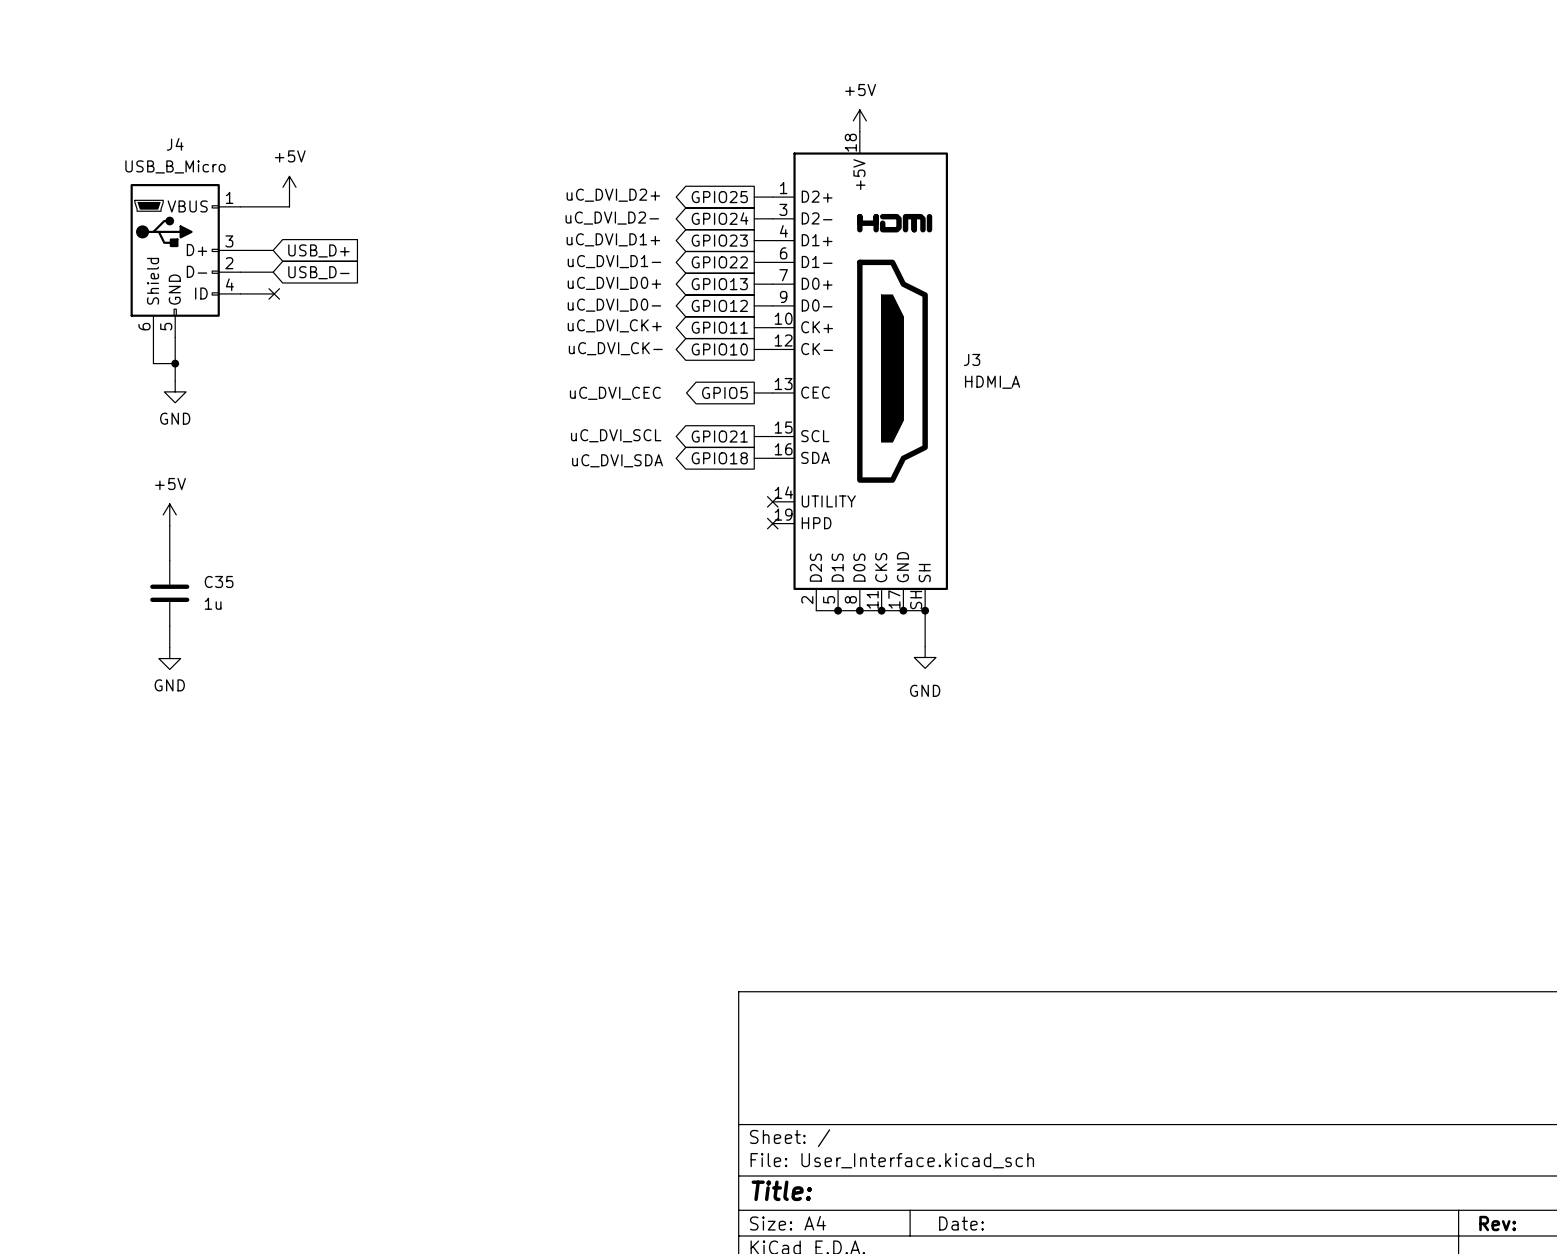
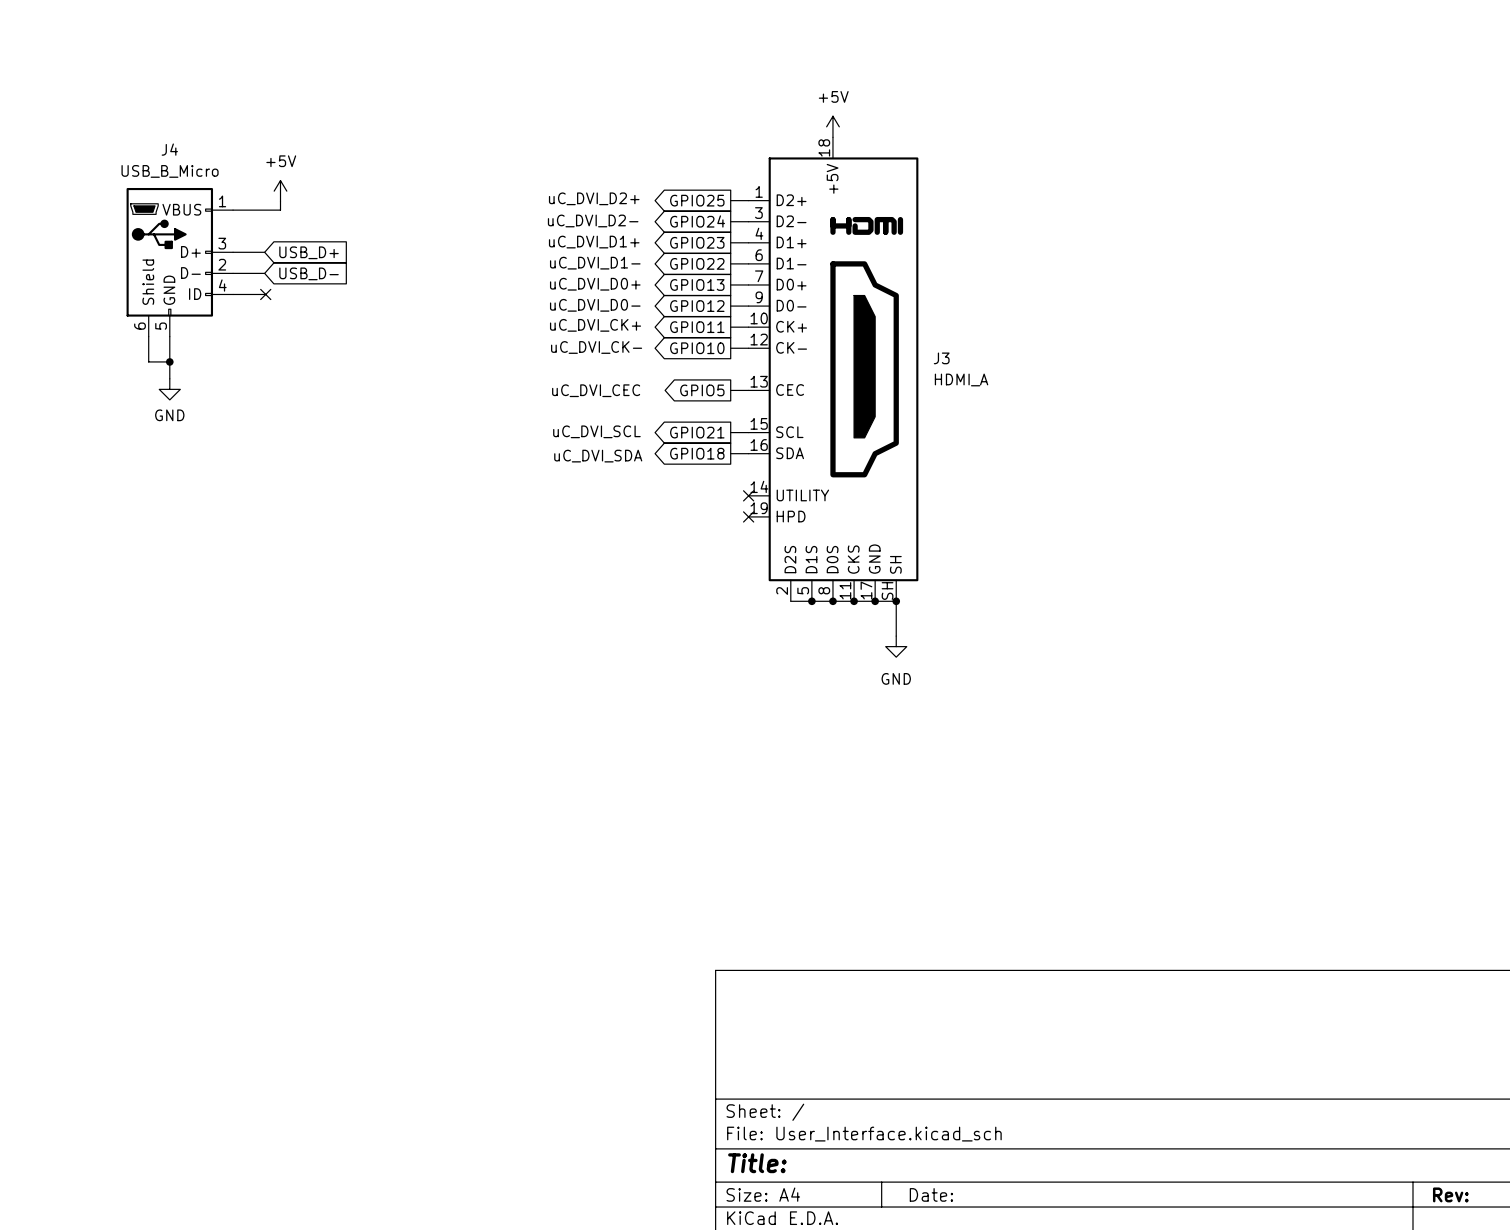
power symbol: +5V (169, 514) -> none
wire: (169, 525) (169, 560) -> none
C35: 1u (169, 593) -> none
wire: (169, 625) (169, 647) -> none
power symbol: GND (169, 658) -> none

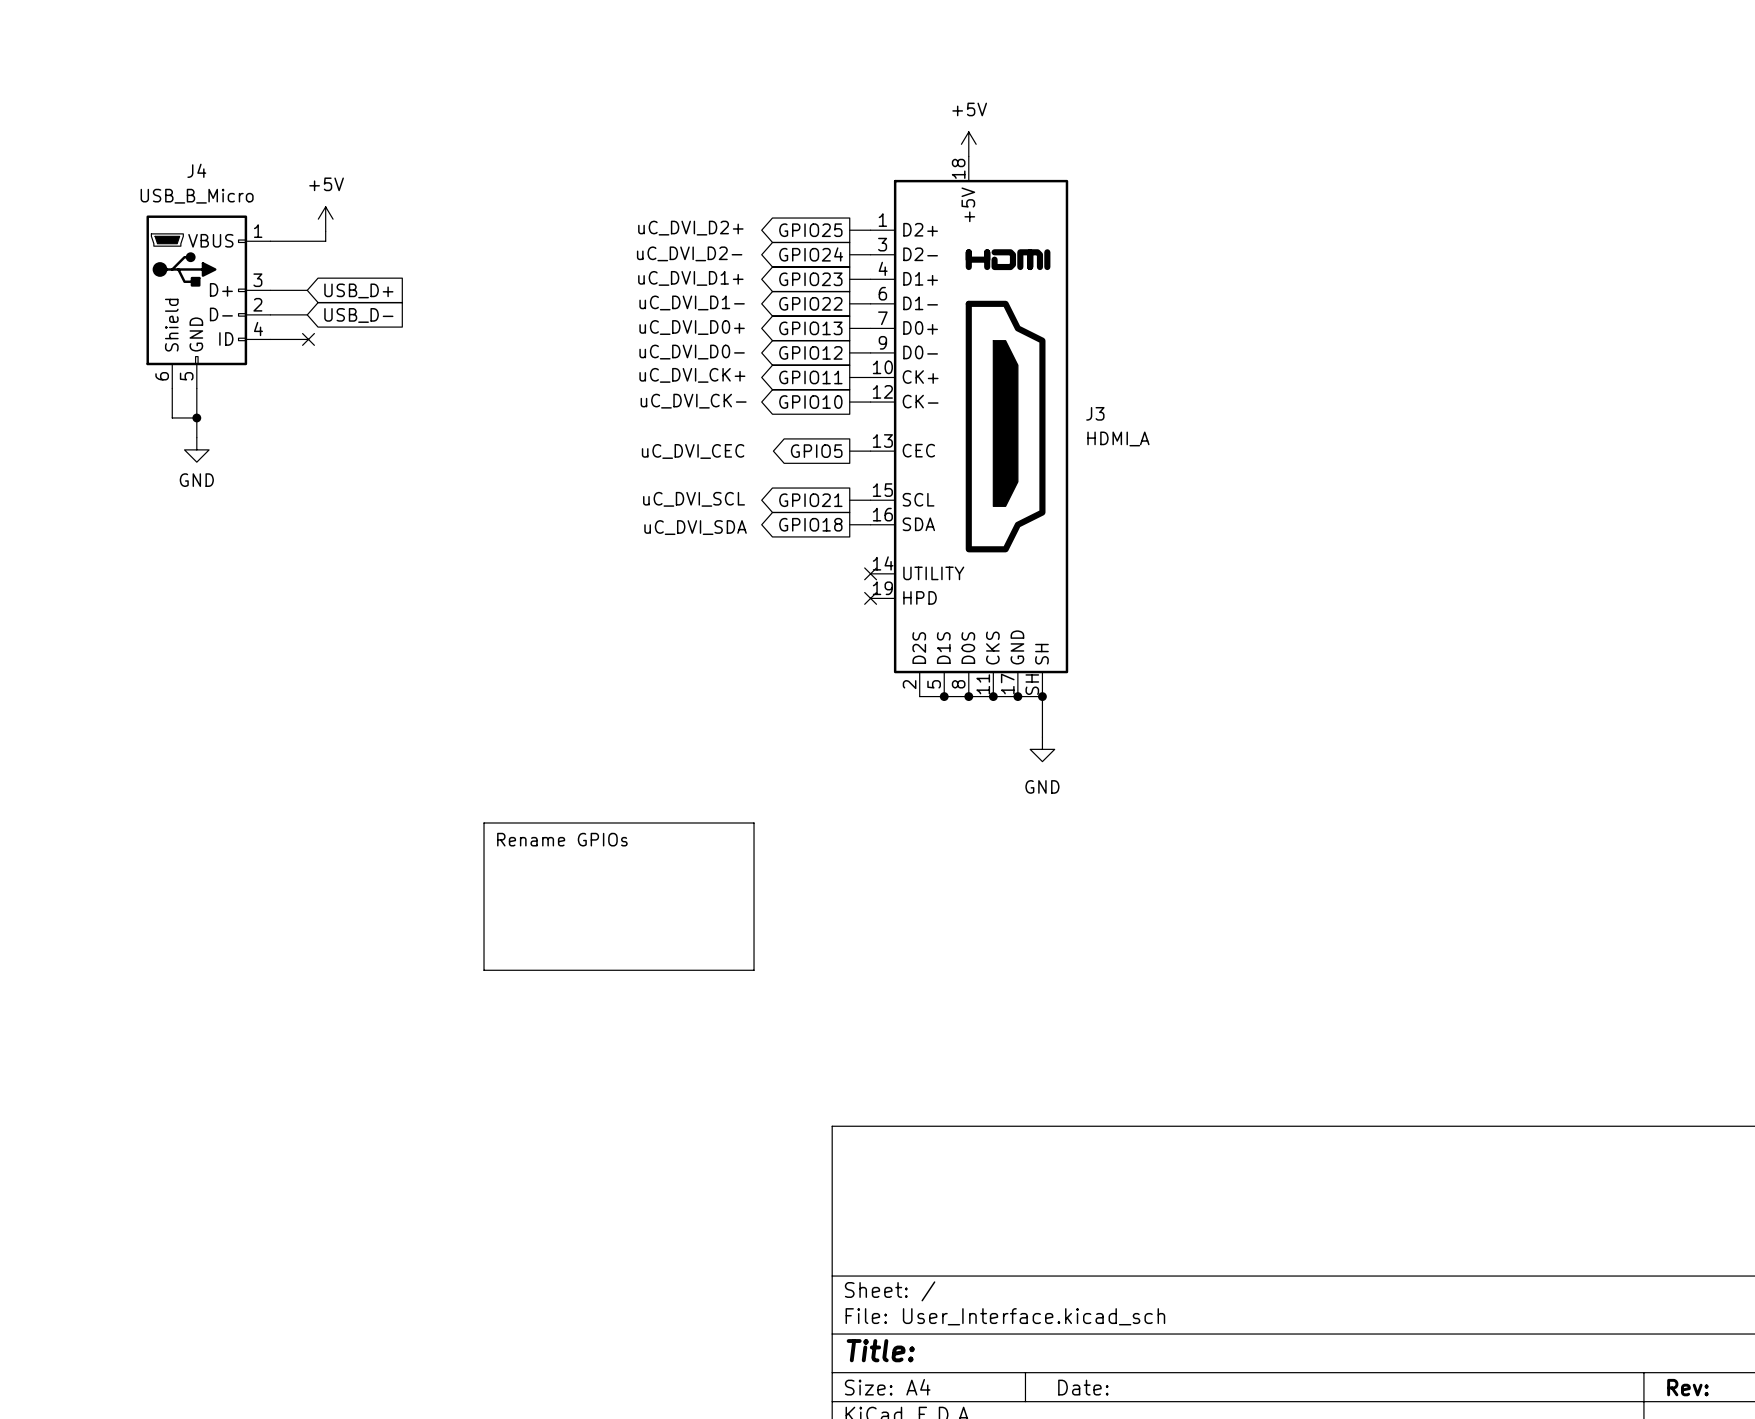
line: none -> (484, 822) (754, 822) (754, 970) (484, 970) (484, 822)
text: none -> Rename GPIOs (562, 839)

